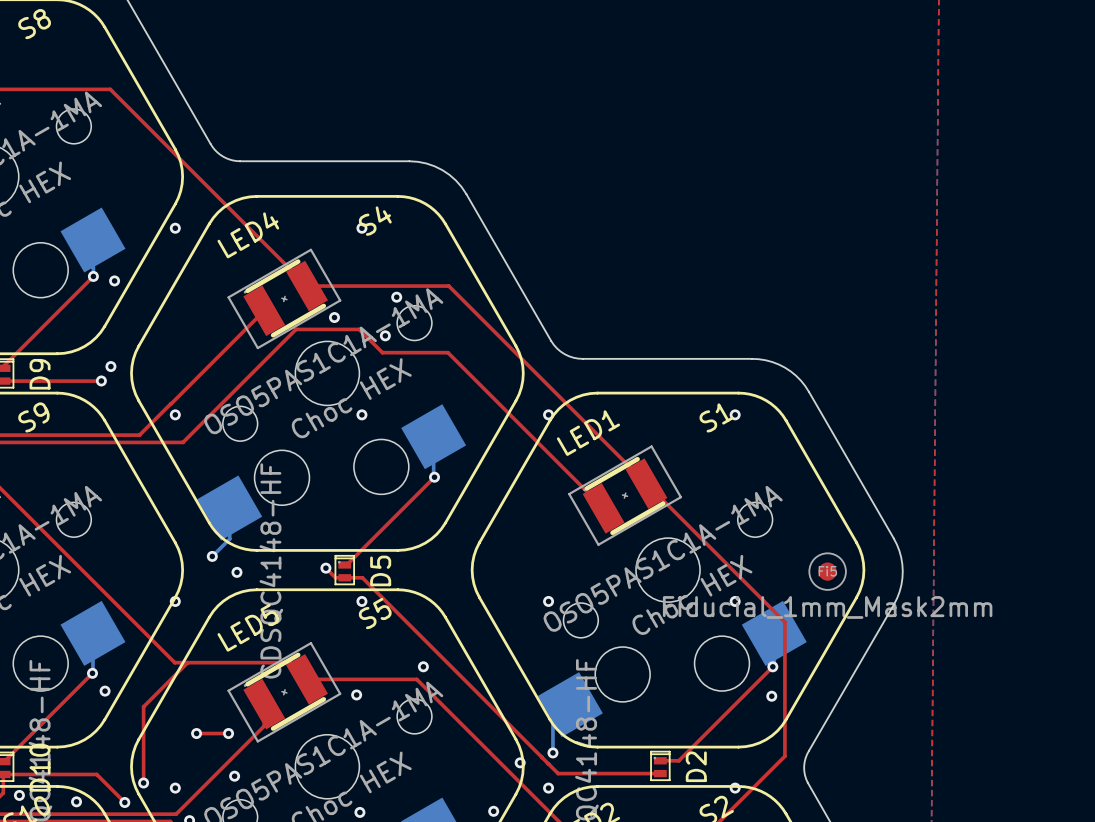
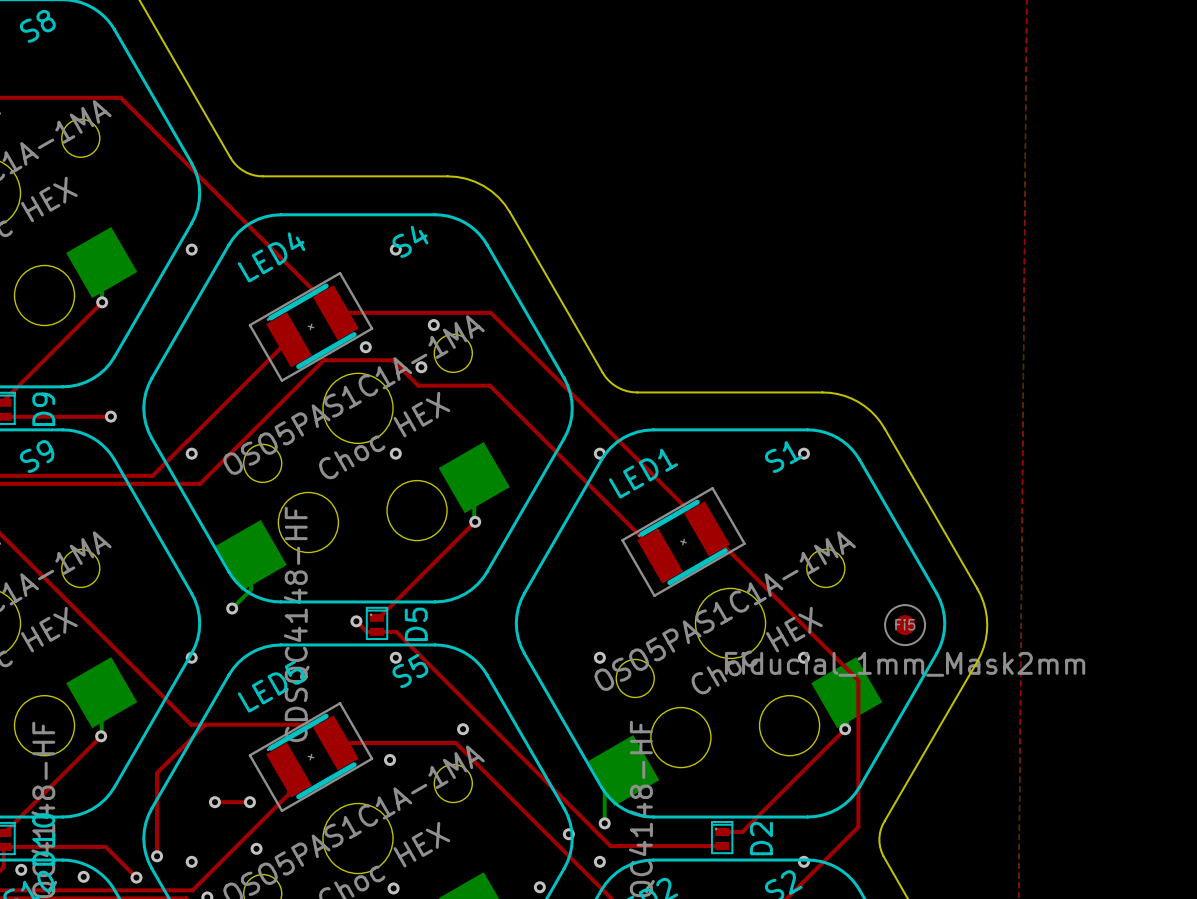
via: (114, 280) -> none
via: (110, 366) -> none
via: (236, 572) -> none
via: (105, 691) -> none
via: (771, 696) -> none

